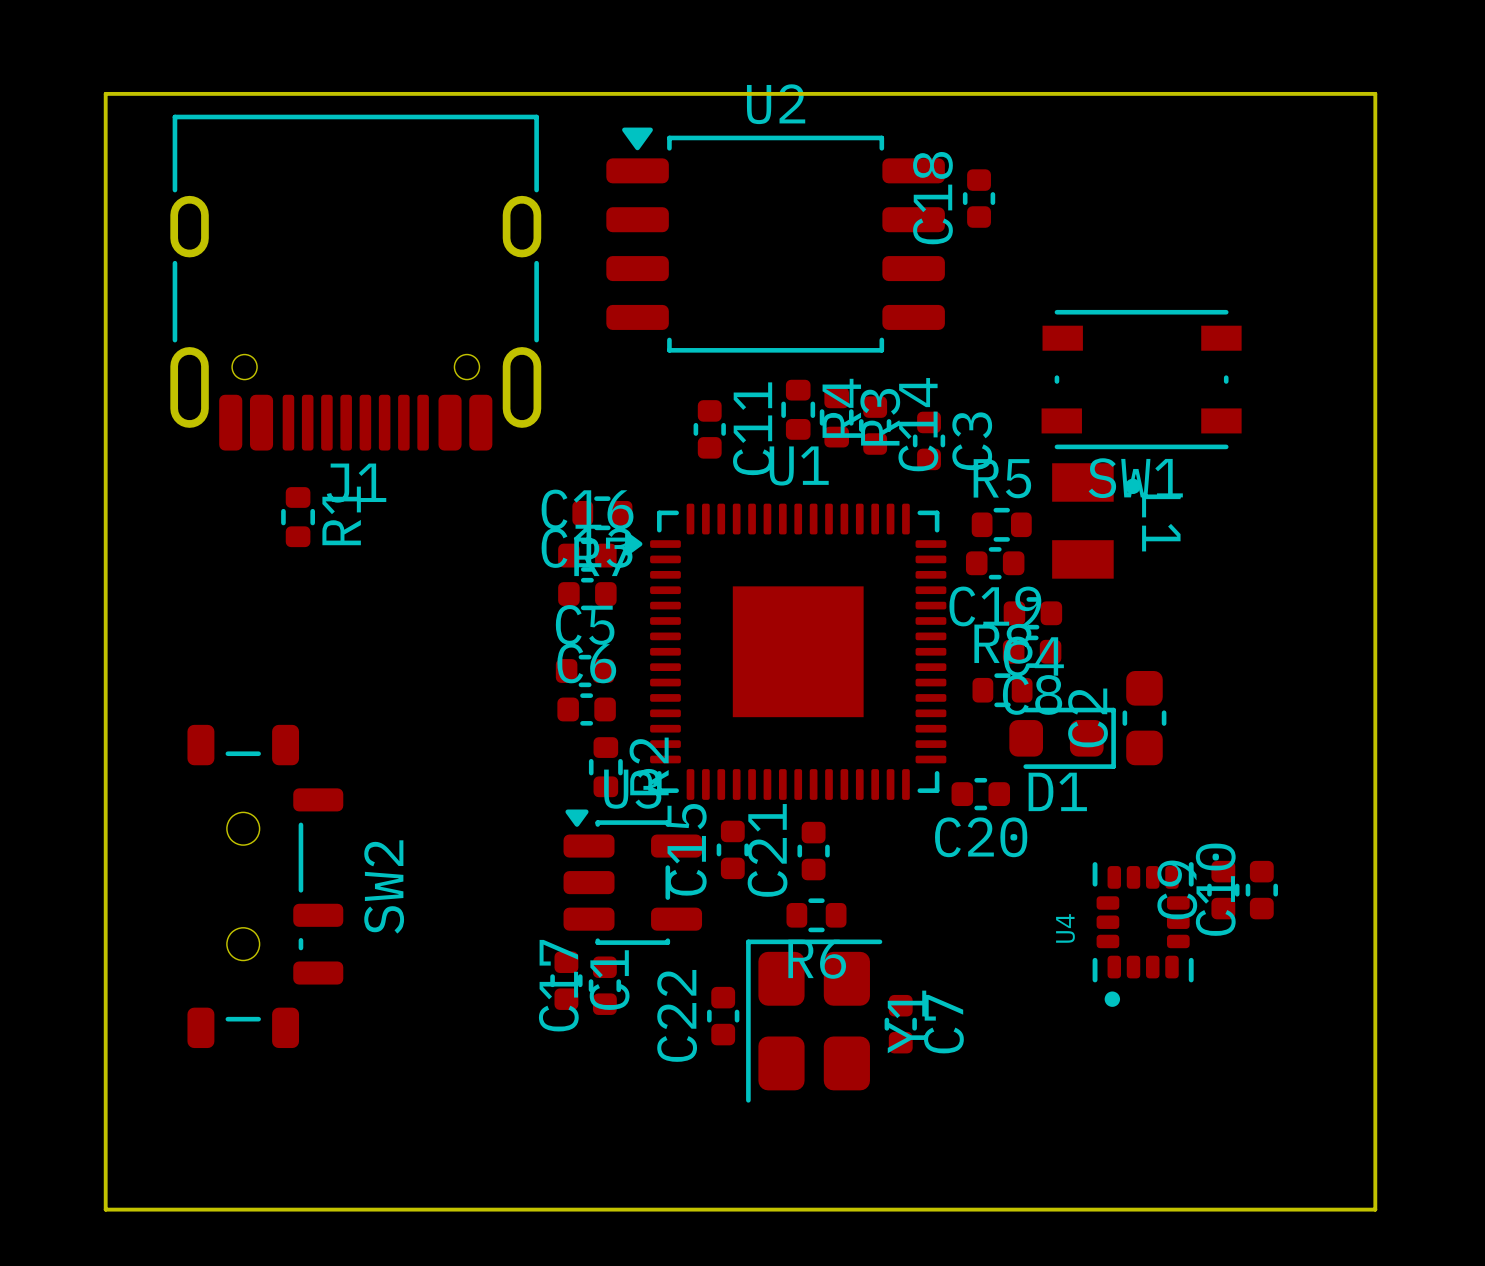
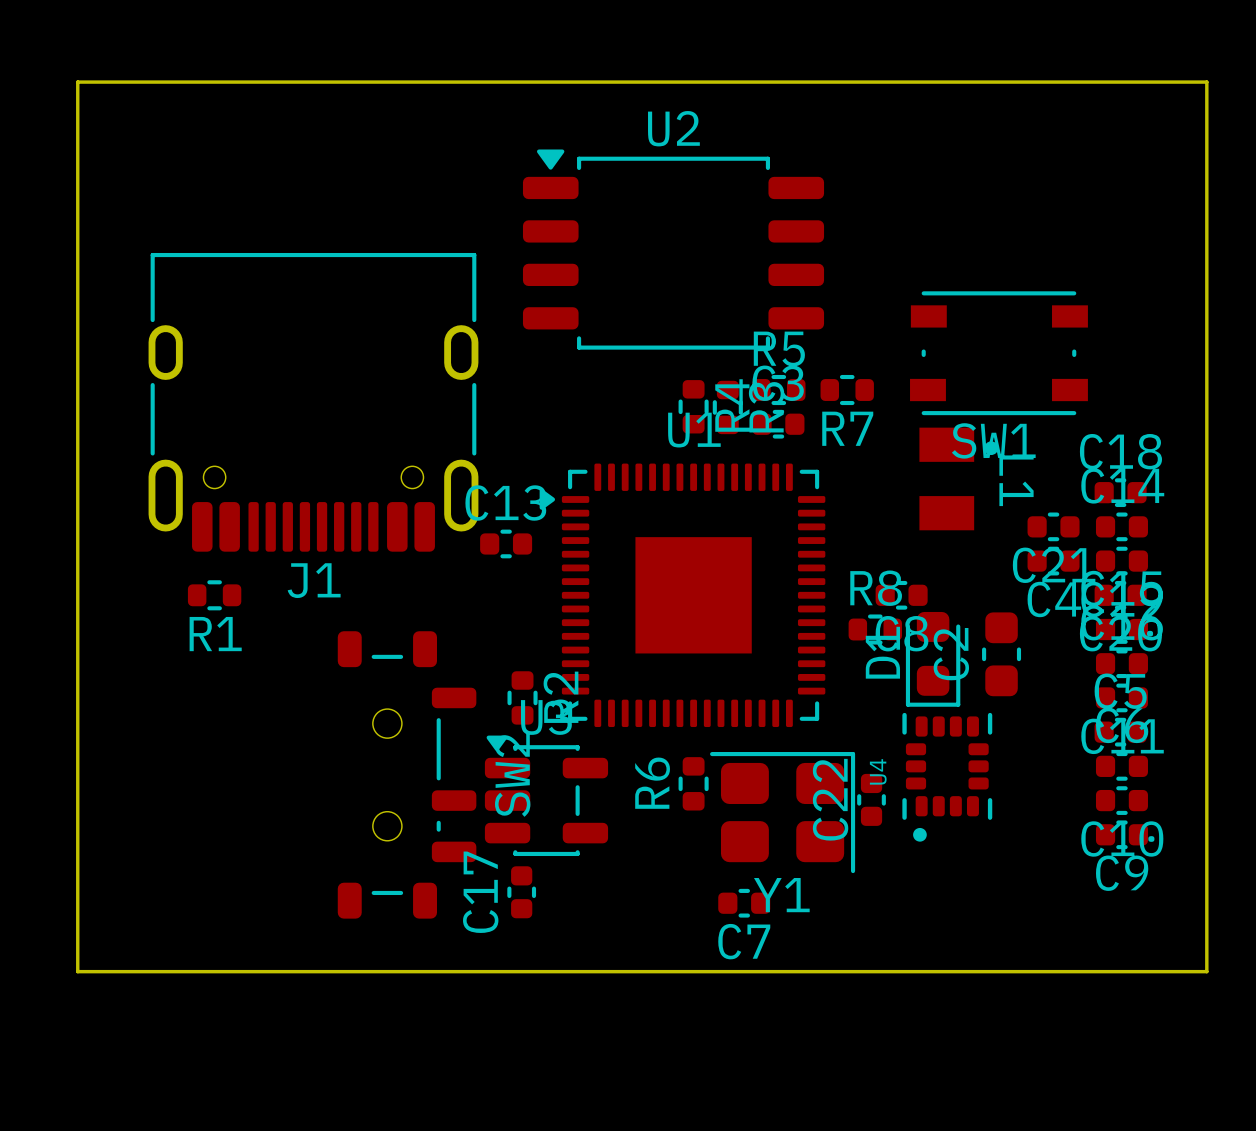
board edge: (105, 93) (1375, 93) -> (77, 99) (77, 82) (1206, 82) (1206, 99)
C18 rotation: 0° (979, 198) -> 90° clockwise (1120, 492)
C18 position: (979, 198) -> (1120, 492)
U2 position: (775, 240) -> (673, 249)
J1 position: (355, 282) -> (313, 402)
R4 position: (798, 409) -> (693, 406)
R3 position: (836, 417) -> (727, 407)
C14 rotation: 0° (875, 425) -> 90° clockwise (1121, 526)
C14 position: (875, 425) -> (1121, 526)
C11 rotation: 0° (709, 429) -> 90° clockwise (1121, 697)
C11 position: (709, 429) -> (1121, 697)
C3 rotation: 0° (929, 440) -> 90° clockwise (778, 424)
C3 position: (929, 440) -> (778, 424)
R7 position: (602, 513) -> (847, 390)
R1 rotation: 0° (298, 517) -> 90° clockwise (214, 595)
R1 position: (298, 517) -> (214, 595)
R5 position: (1001, 524) -> (778, 390)
C16 position: (587, 555) -> (1121, 663)
C19 position: (995, 563) -> (1121, 561)
C4 position: (1032, 613) -> (1053, 561)
C5 position: (585, 671) -> (1120, 732)
C6 position: (586, 709) -> (1121, 766)
D1 rotation: 0° (1062, 738) -> 90° clockwise (933, 659)
C20 position: (980, 794) -> (1120, 595)
C15 rotation: 0° (732, 849) -> 90° clockwise (1121, 629)
C15 position: (732, 849) -> (1121, 629)
C21 rotation: 0° (813, 851) -> 90° clockwise (1053, 526)
C21 position: (813, 851) -> (1053, 526)
SW2 position: (265, 886) -> (407, 774)
C9 rotation: 0° (1223, 890) -> 90° clockwise (1121, 834)
C9 position: (1223, 890) -> (1121, 834)
C10 rotation: 0° (1261, 890) -> 90° clockwise (1121, 800)
R6 rotation: 0° (816, 915) -> 90° clockwise (693, 783)
R6 position: (816, 915) -> (693, 783)
U4 position: (1143, 934) -> (947, 777)
C1: (566, 980) -> none
C22 position: (723, 1016) -> (871, 799)
Y1 rotation: 0° (814, 1021) -> 90° clockwise (782, 812)
Y1 position: (814, 1021) -> (782, 812)
C7 rotation: 0° (900, 1024) -> 90° clockwise (744, 903)
C7 position: (900, 1024) -> (744, 903)
board edge: (105, 1074) (105, 1209) (1375, 1209) (1375, 1074) -> (77, 971) (1206, 971)

